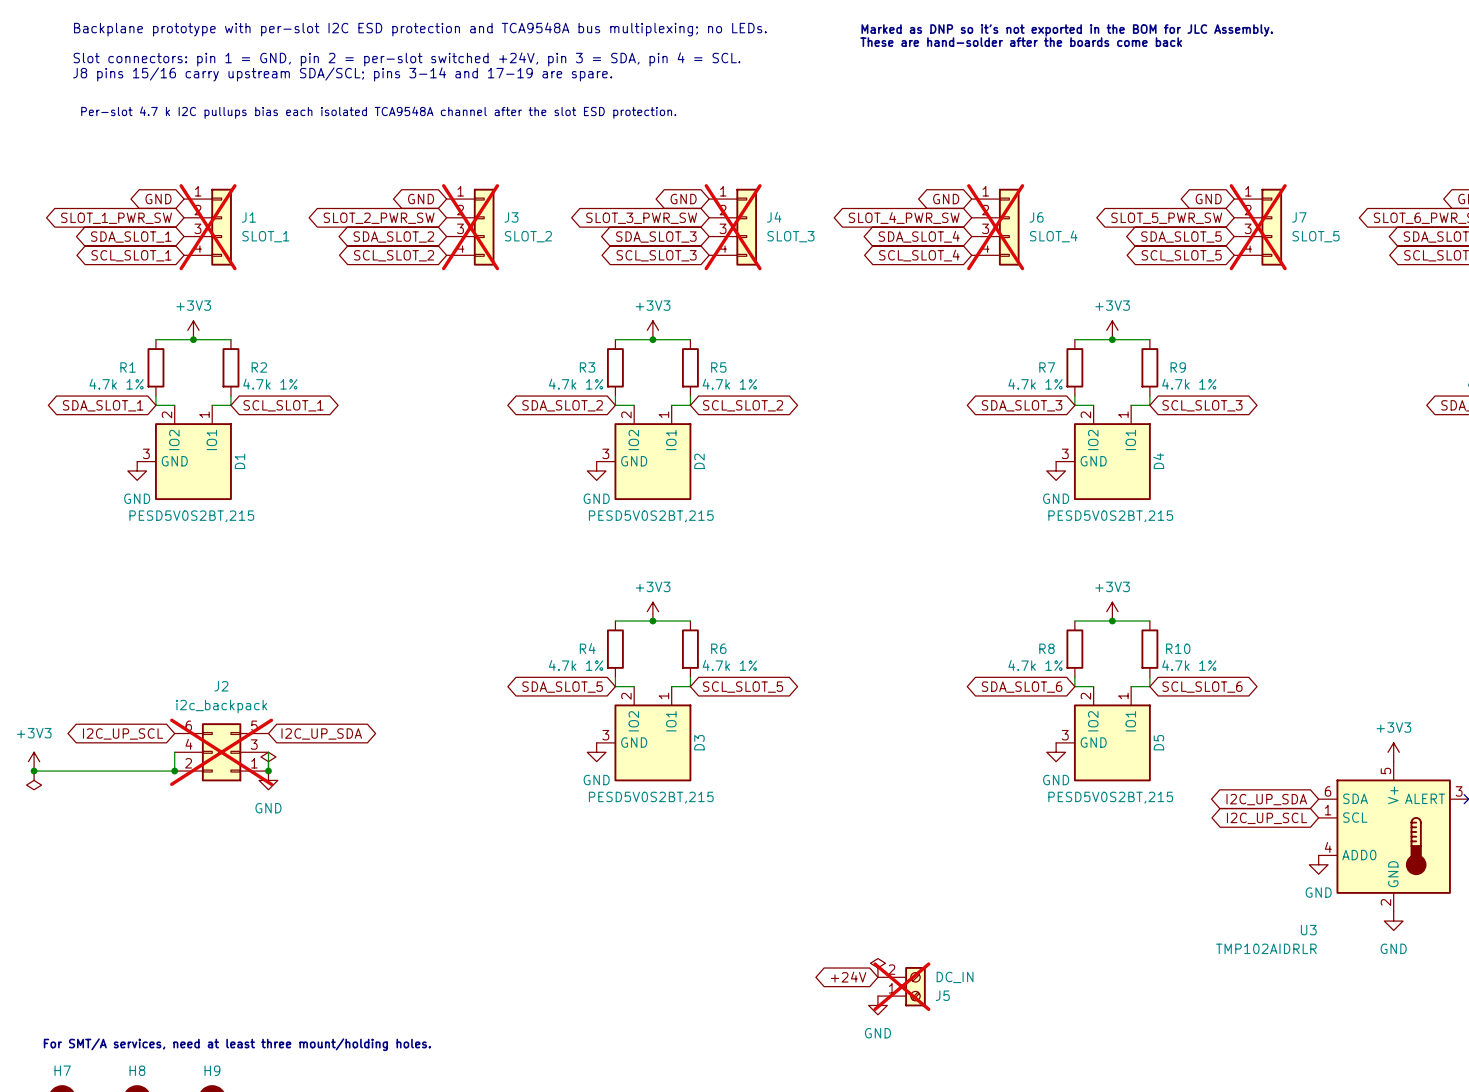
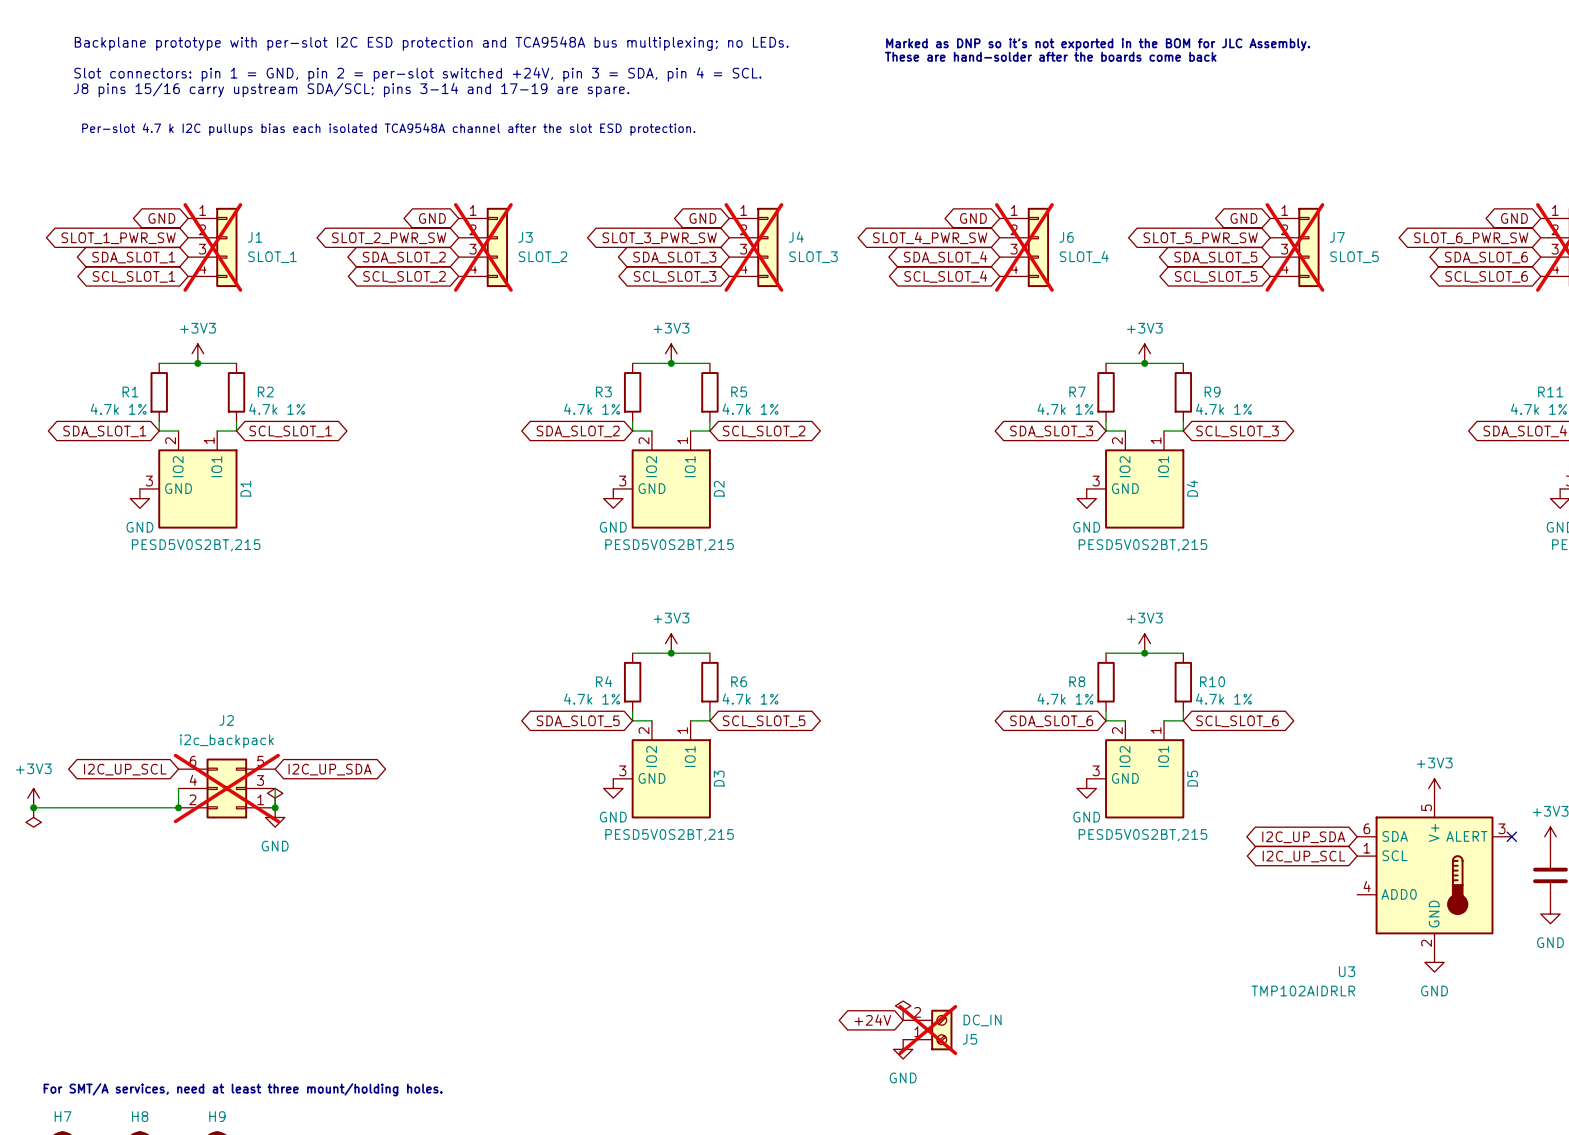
power symbol: GND (1318, 864) -> none

